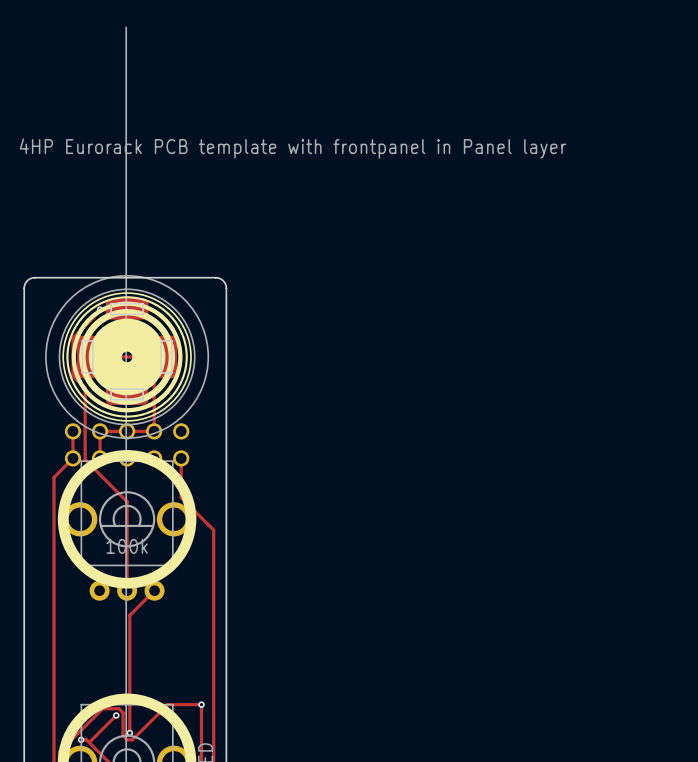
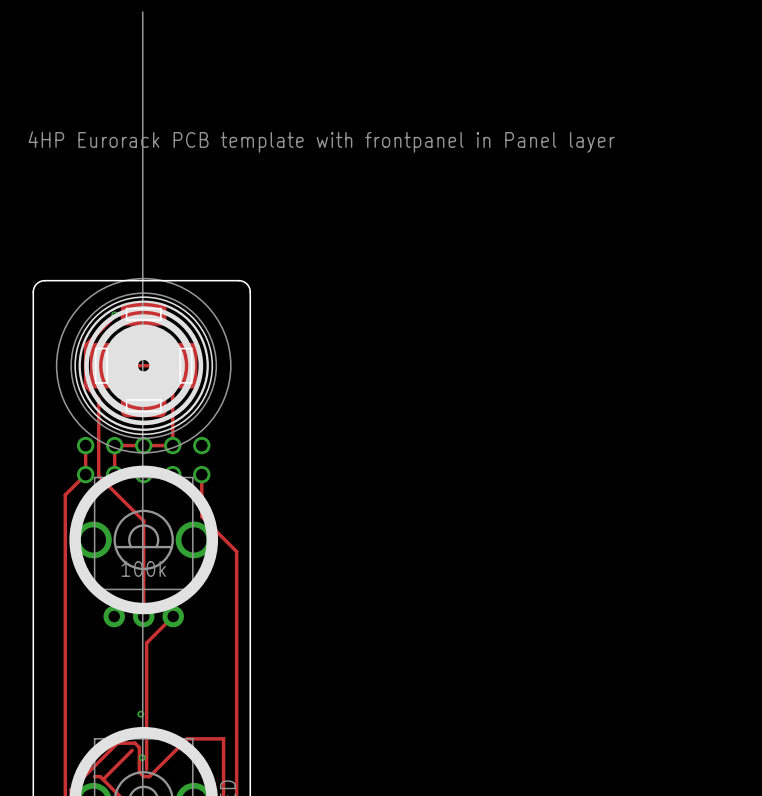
via: none -> (140, 714)
via: (201, 704) -> none
via: (116, 715) -> none
via: none -> (142, 757)
via: (129, 733) -> none
via: (81, 739) -> none

